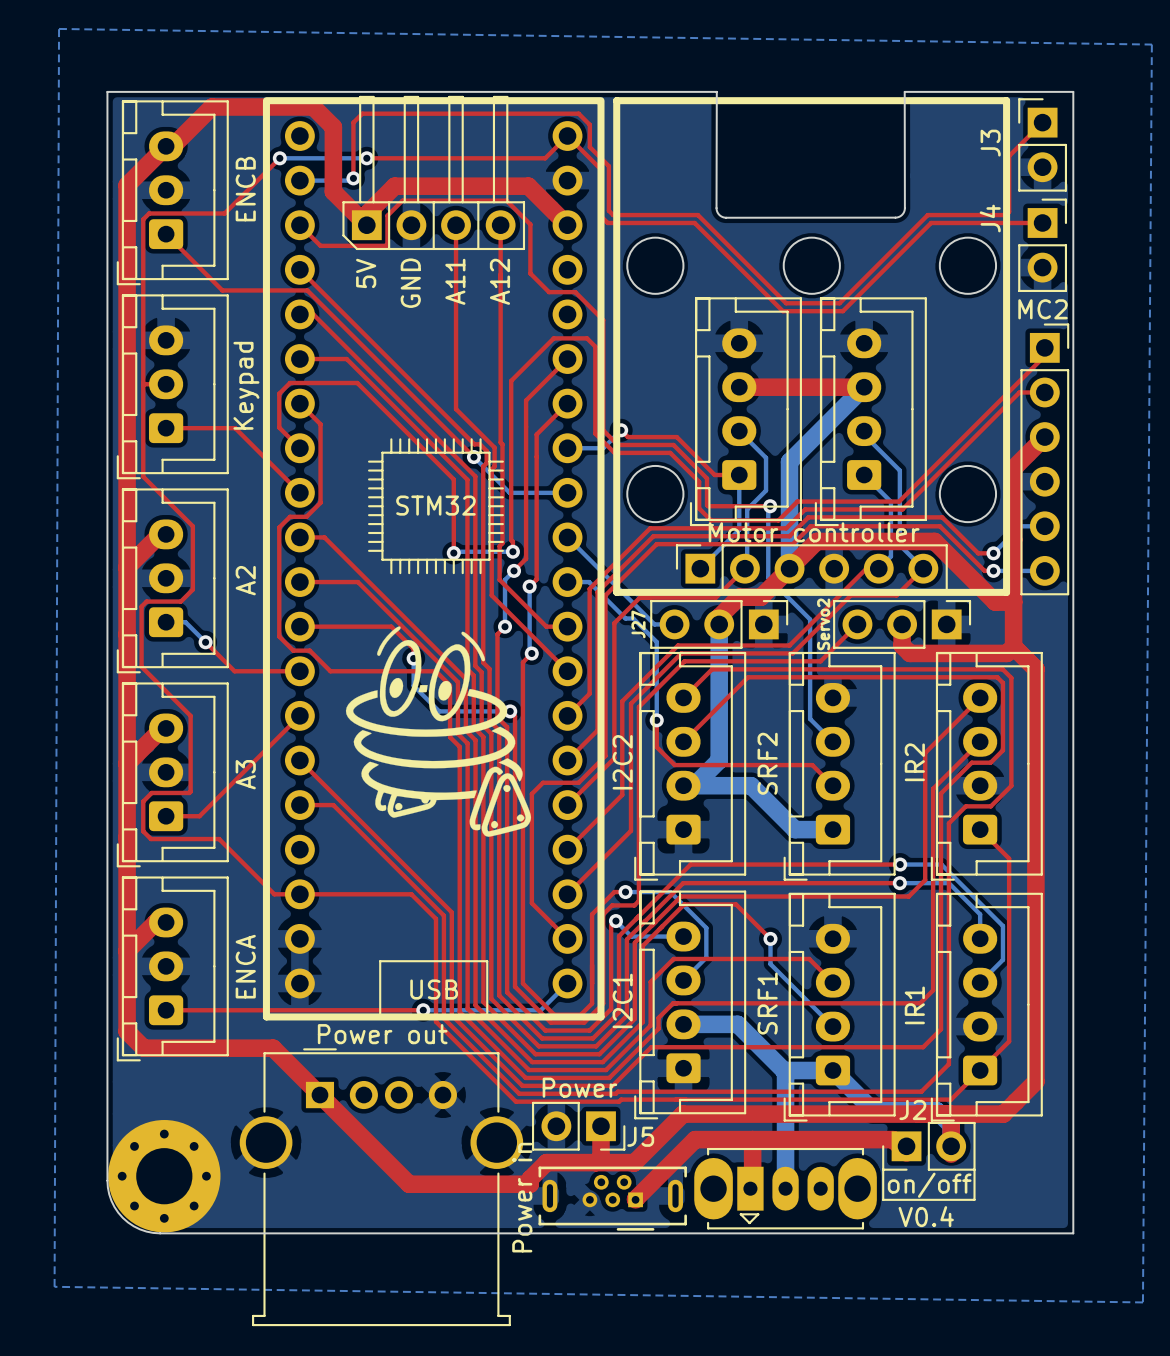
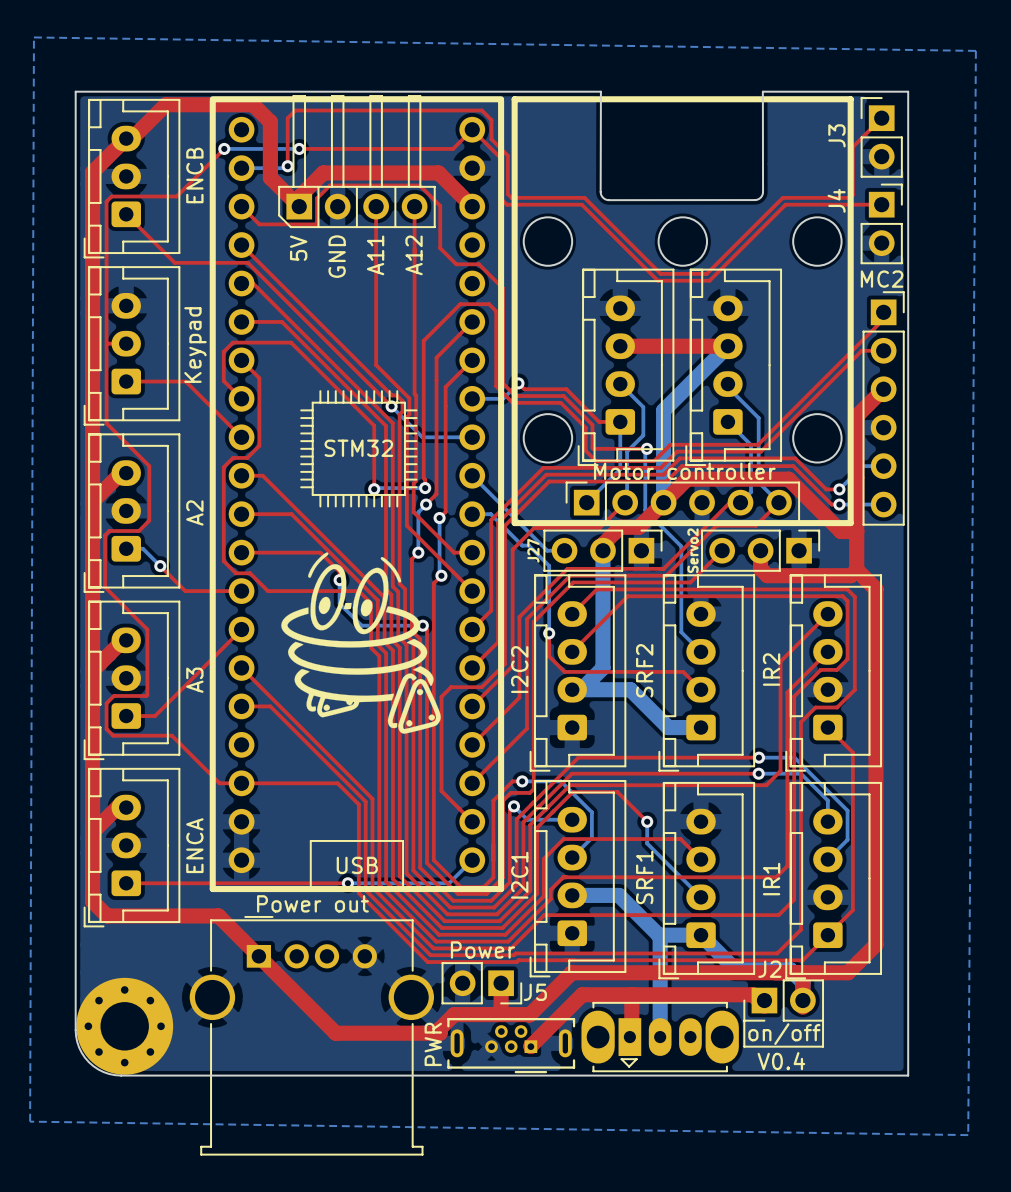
part value: Power in (522, 1197) -> PWR (433, 1044)

